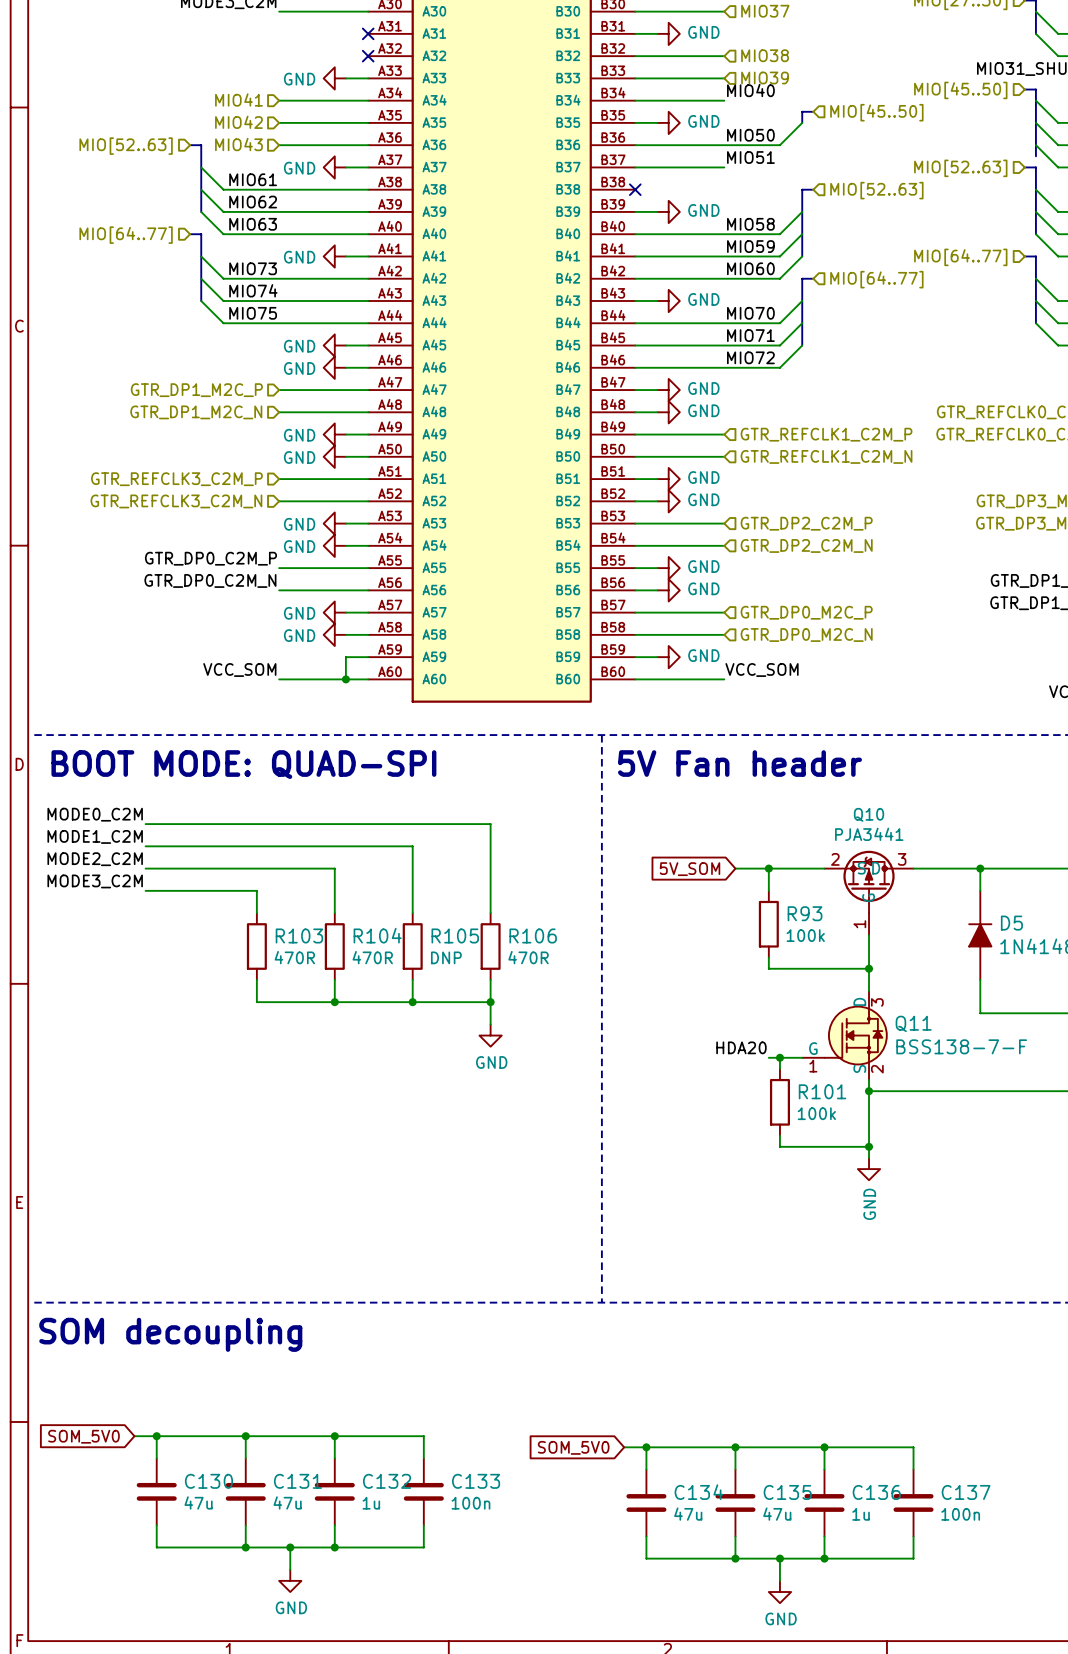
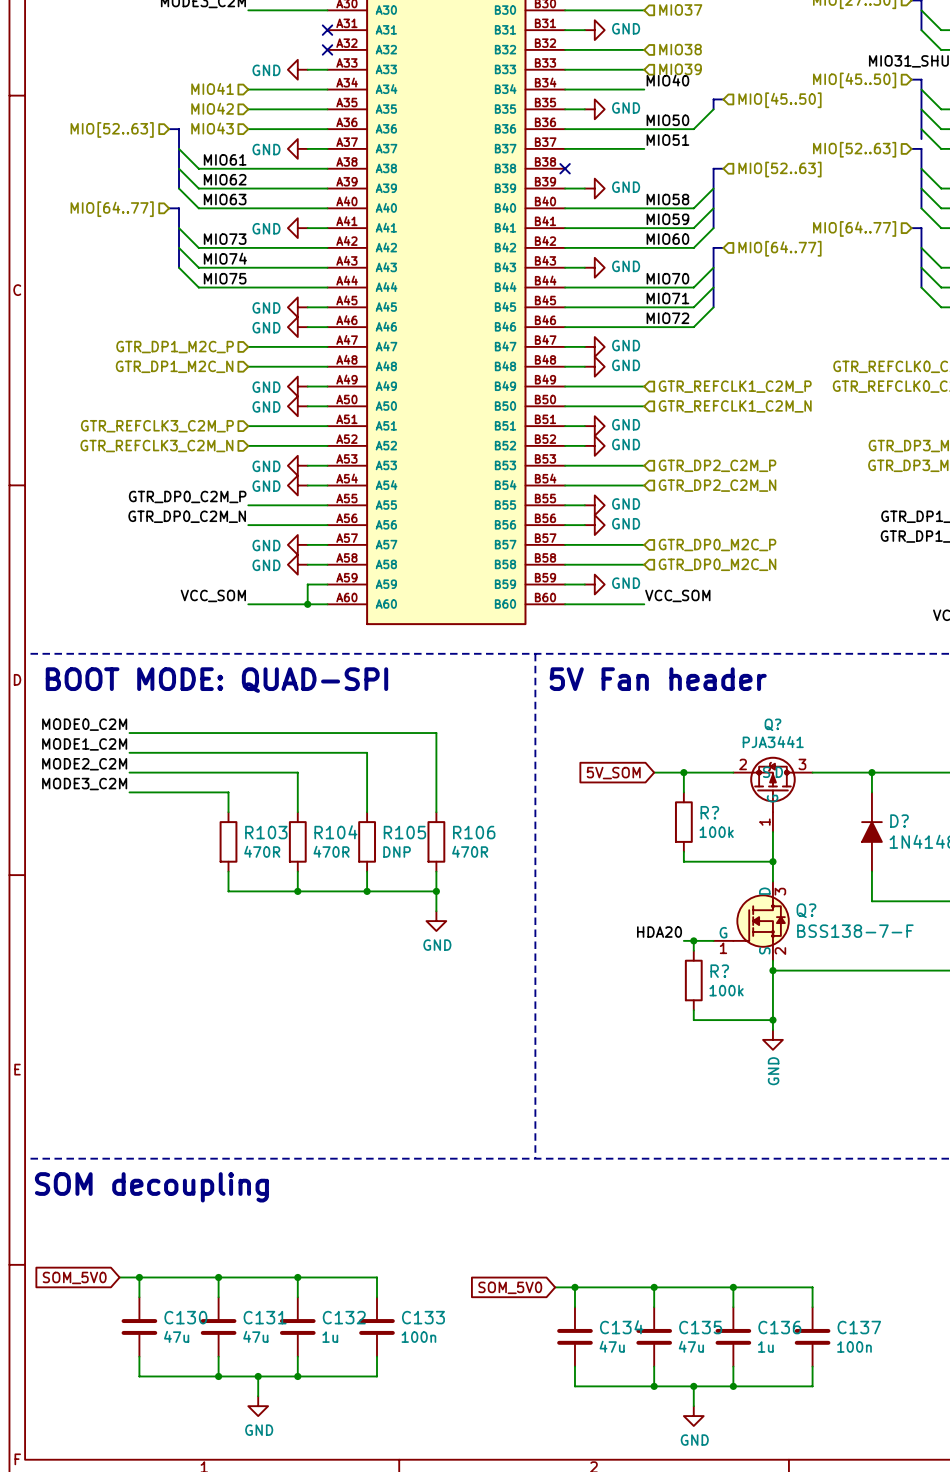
Q10 name: Q10 (869, 814) -> Q? (772, 724)
R93 name: R93 (805, 913) -> R? (709, 812)
D5 name: D5 (1011, 923) -> D? (899, 821)
Q11 name: Q11 (913, 1023) -> Q? (806, 910)
R101 name: R101 (822, 1091) -> R? (719, 971)

